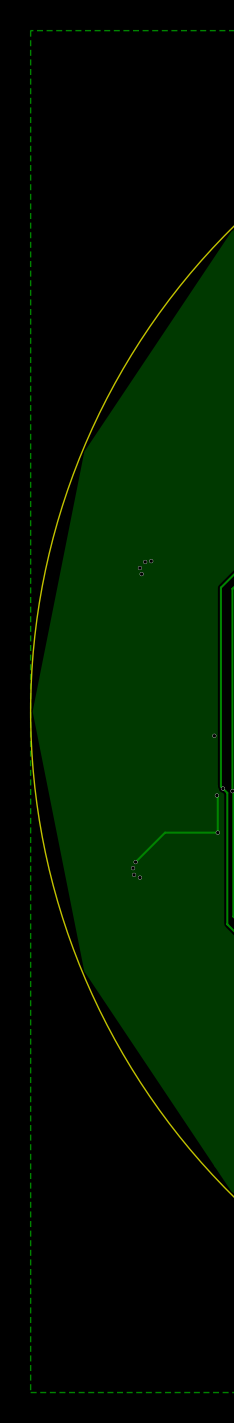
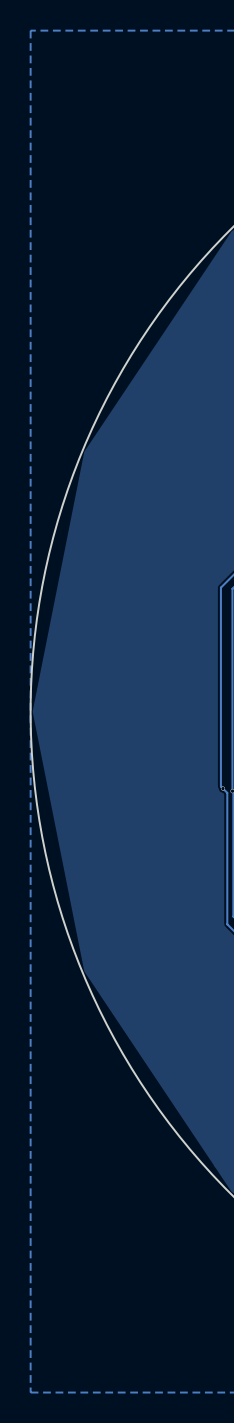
via: (145, 561) -> none
via: (151, 561) -> none
via: (139, 568) -> none
via: (141, 574) -> none
via: (214, 735) -> none
track: (216, 795) (217, 832) (165, 832) (135, 862) -> none
via: (216, 795) -> none
via: (217, 832) -> none
via: (135, 862) -> none
via: (133, 868) -> none
via: (134, 874) -> none
via: (139, 877) -> none

